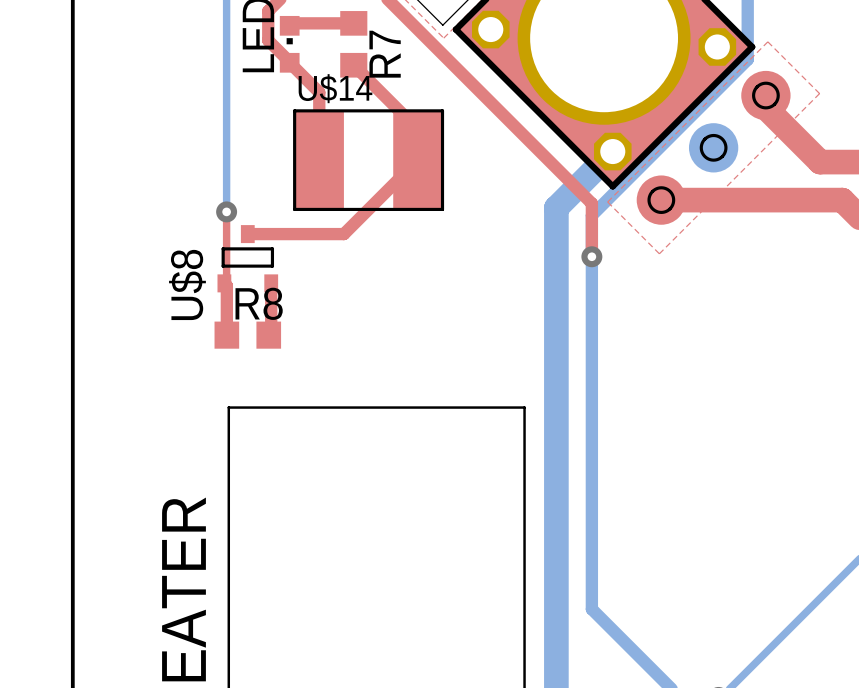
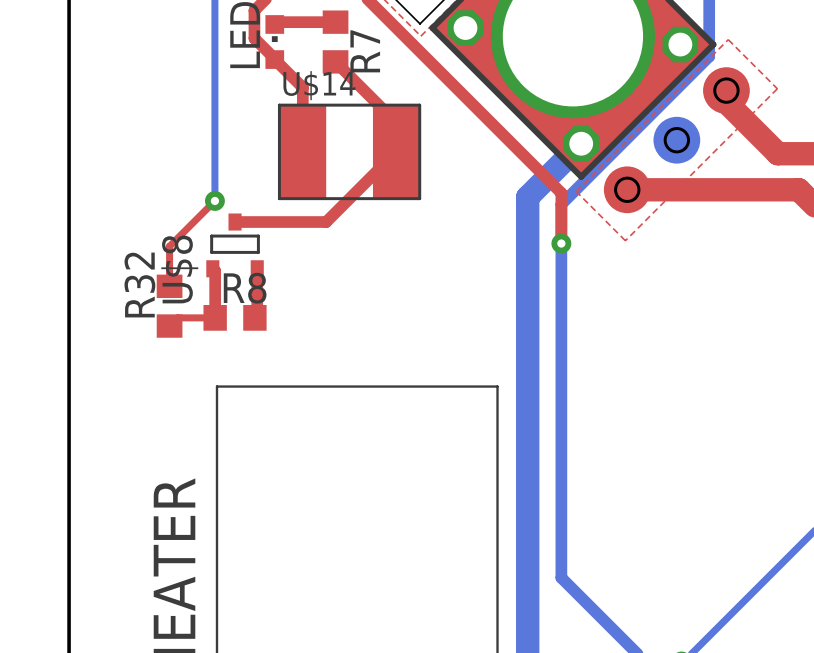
top track: (226, 211) (226, 282) (224, 283) -> (214, 200) (169, 246) (169, 286)
R32: none -> (169, 306)
top track: none -> (215, 317) (177, 317) (169, 326)

